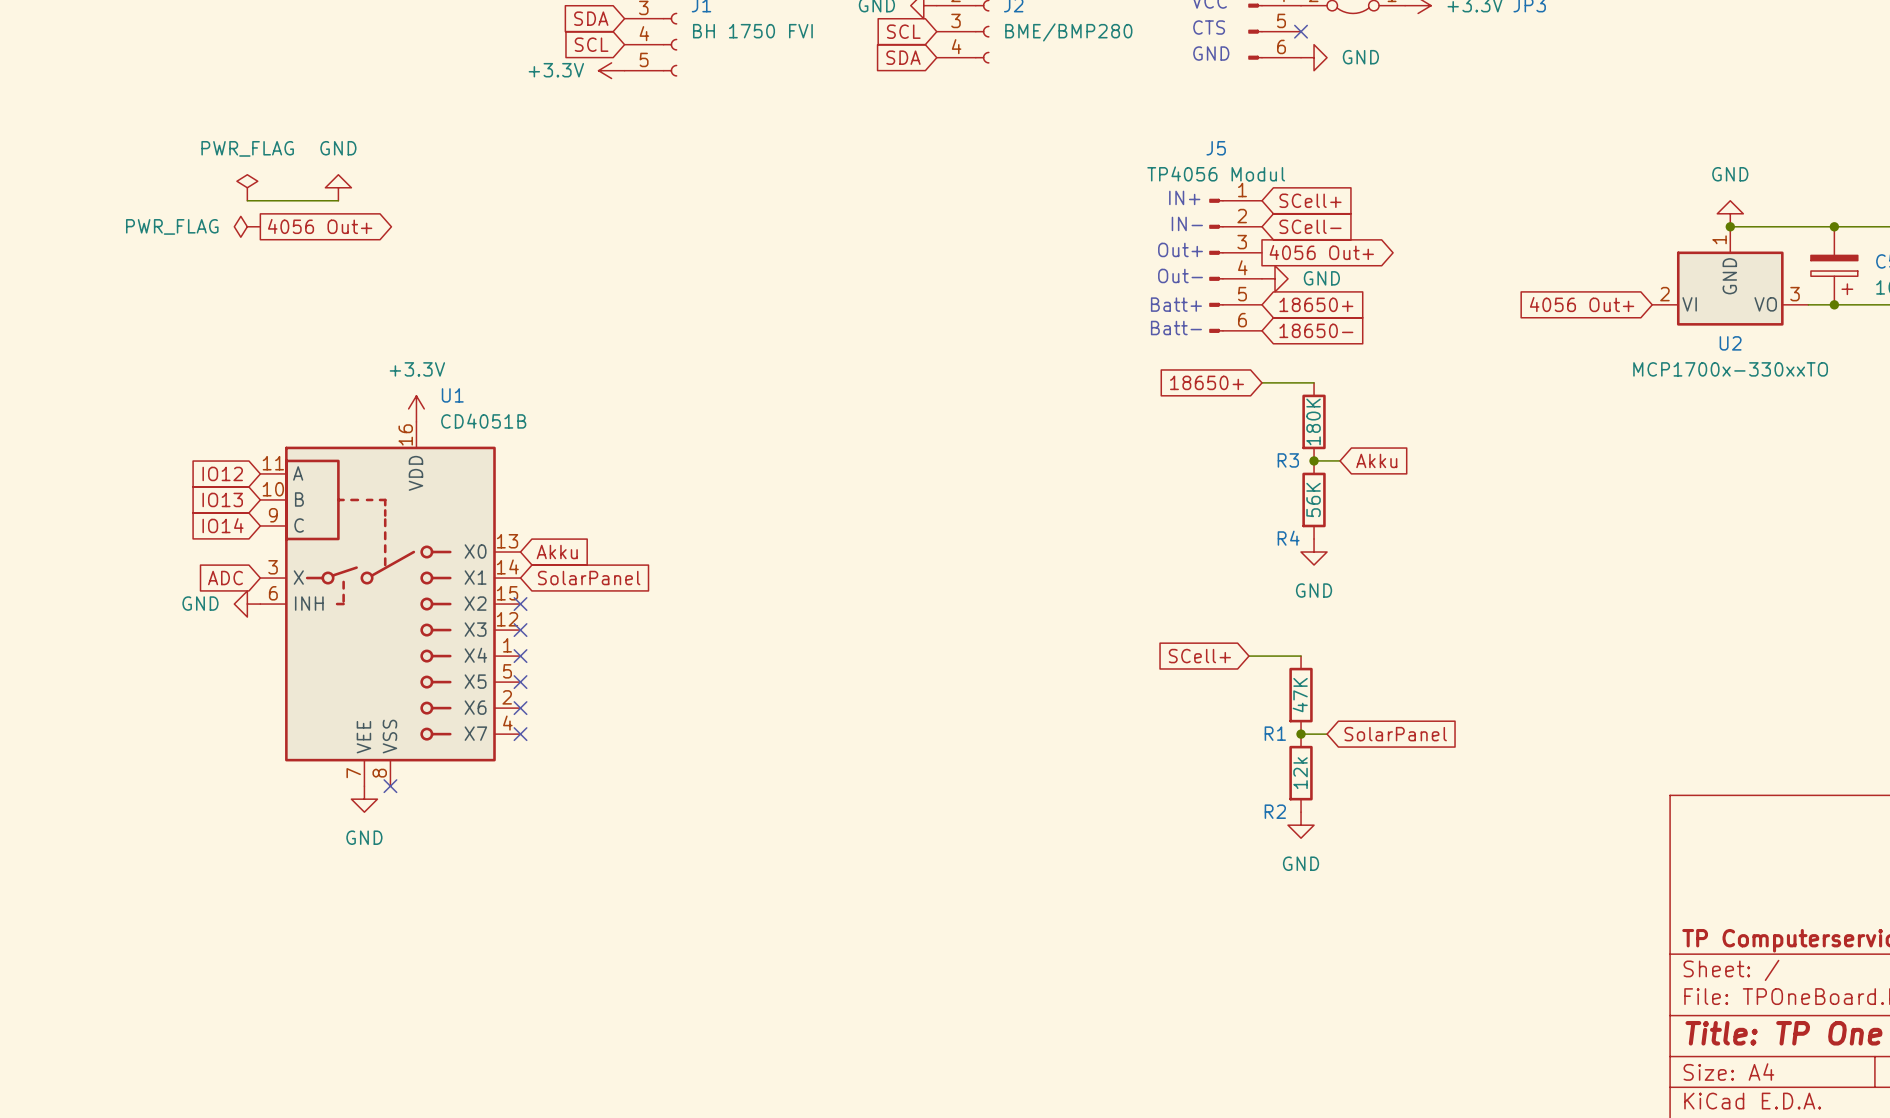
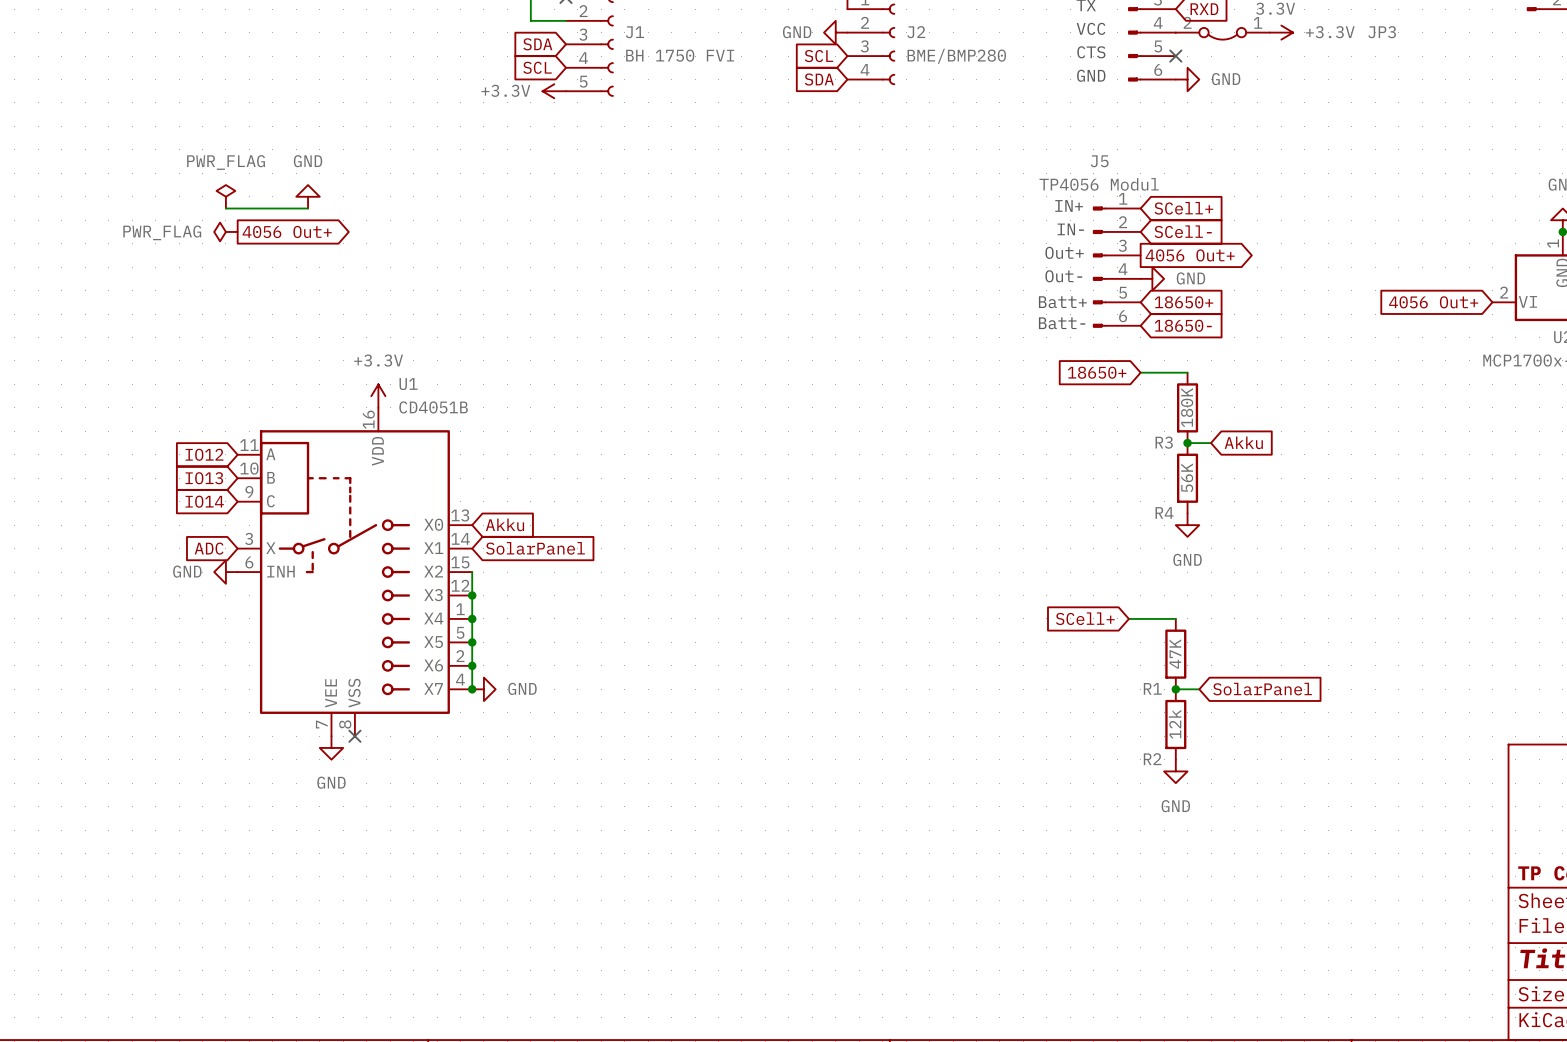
wire: none -> (472, 572) (472, 689)
no-connect mark: (520, 604) -> none
no-connect mark: (520, 630) -> none
junction: none -> (472, 595)
no-connect mark: (520, 656) -> none
junction: none -> (472, 618)
no-connect mark: (520, 682) -> none
junction: none -> (472, 642)
no-connect mark: (520, 708) -> none
junction: none -> (472, 665)
no-connect mark: (520, 734) -> none
junction: none -> (472, 689)
power symbol: none -> GND (483, 689)

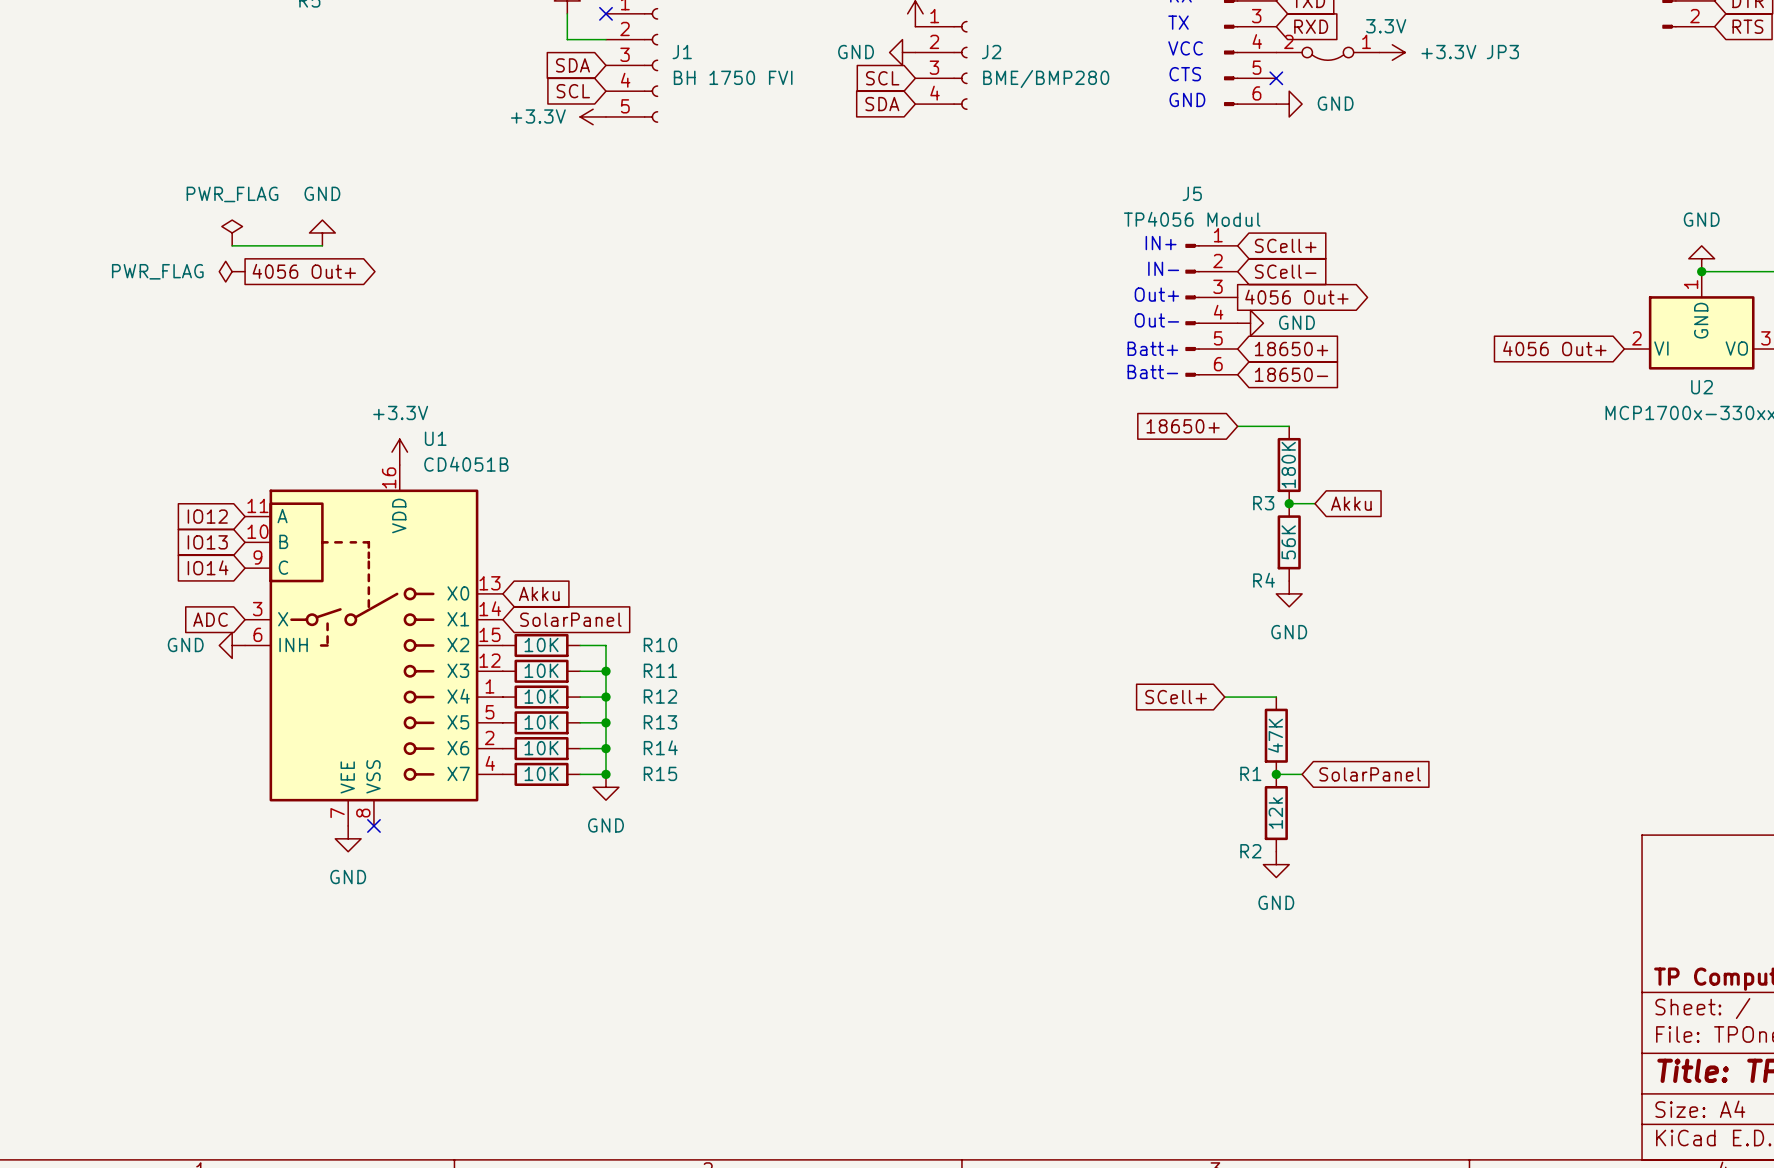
wire: (472, 572) (472, 689) -> none
R10: none -> 10K (541, 645)
wire: none -> (580, 645) (606, 645) (606, 774) (580, 774)
junction: (472, 595) -> none
R11: none -> 10K (541, 671)
wire: none -> (580, 671) (606, 671)
junction: none -> (606, 671)
junction: (472, 618) -> none
R12: none -> 10K (541, 697)
wire: none -> (580, 697) (606, 697)
junction: none -> (606, 697)
junction: (472, 642) -> none
R13: none -> 10K (541, 722)
wire: none -> (580, 722) (606, 722)
junction: none -> (606, 722)
junction: (472, 665) -> none
R14: none -> 10K (541, 748)
wire: none -> (580, 748) (606, 748)
junction: none -> (606, 748)
junction: (472, 689) -> none
power symbol rotation: 0° (483, 689) -> 90° clockwise (606, 787)
power symbol position: GND (483, 689) -> GND (606, 787)
R15: none -> 10K (541, 774)
junction: none -> (606, 774)

